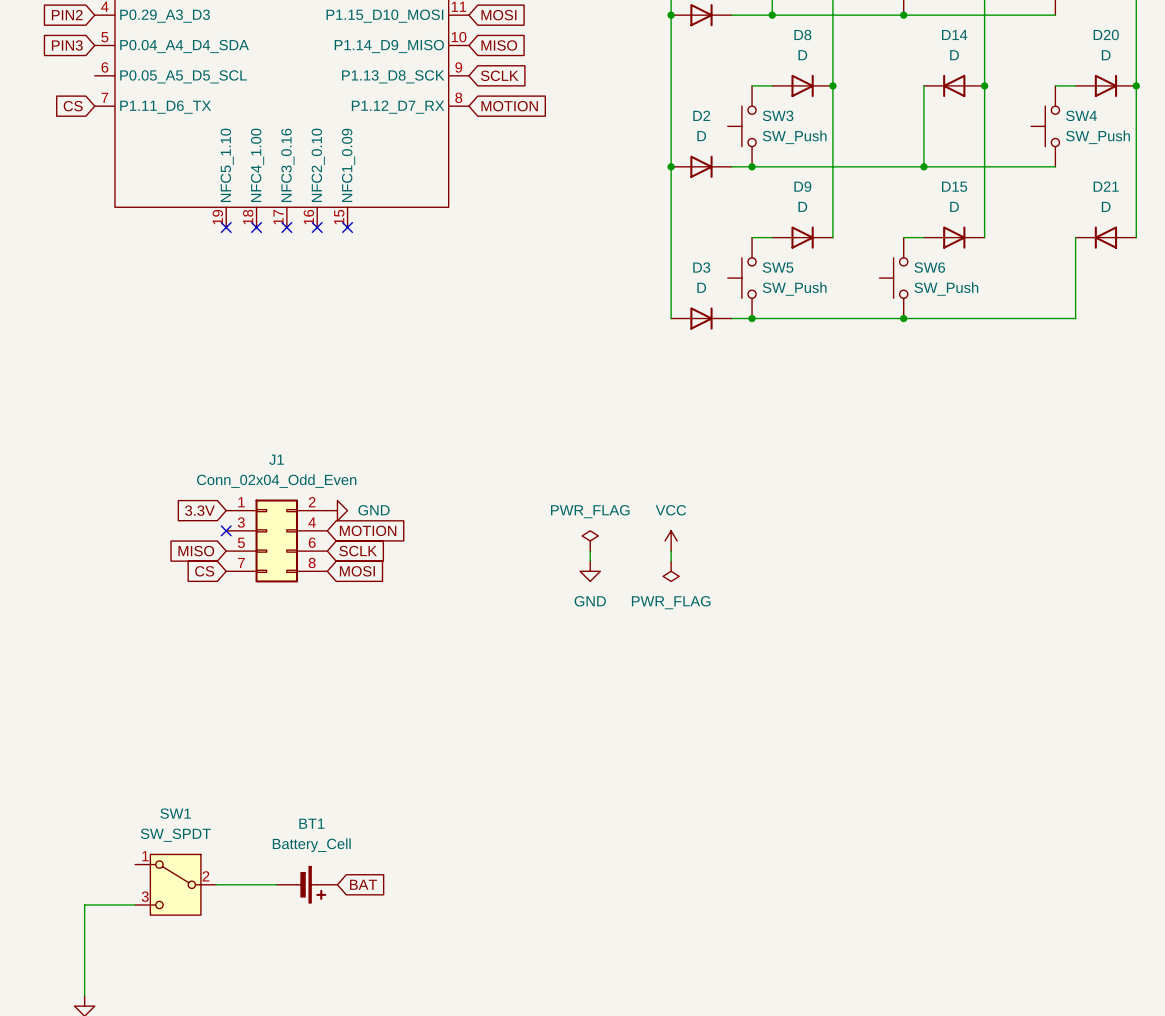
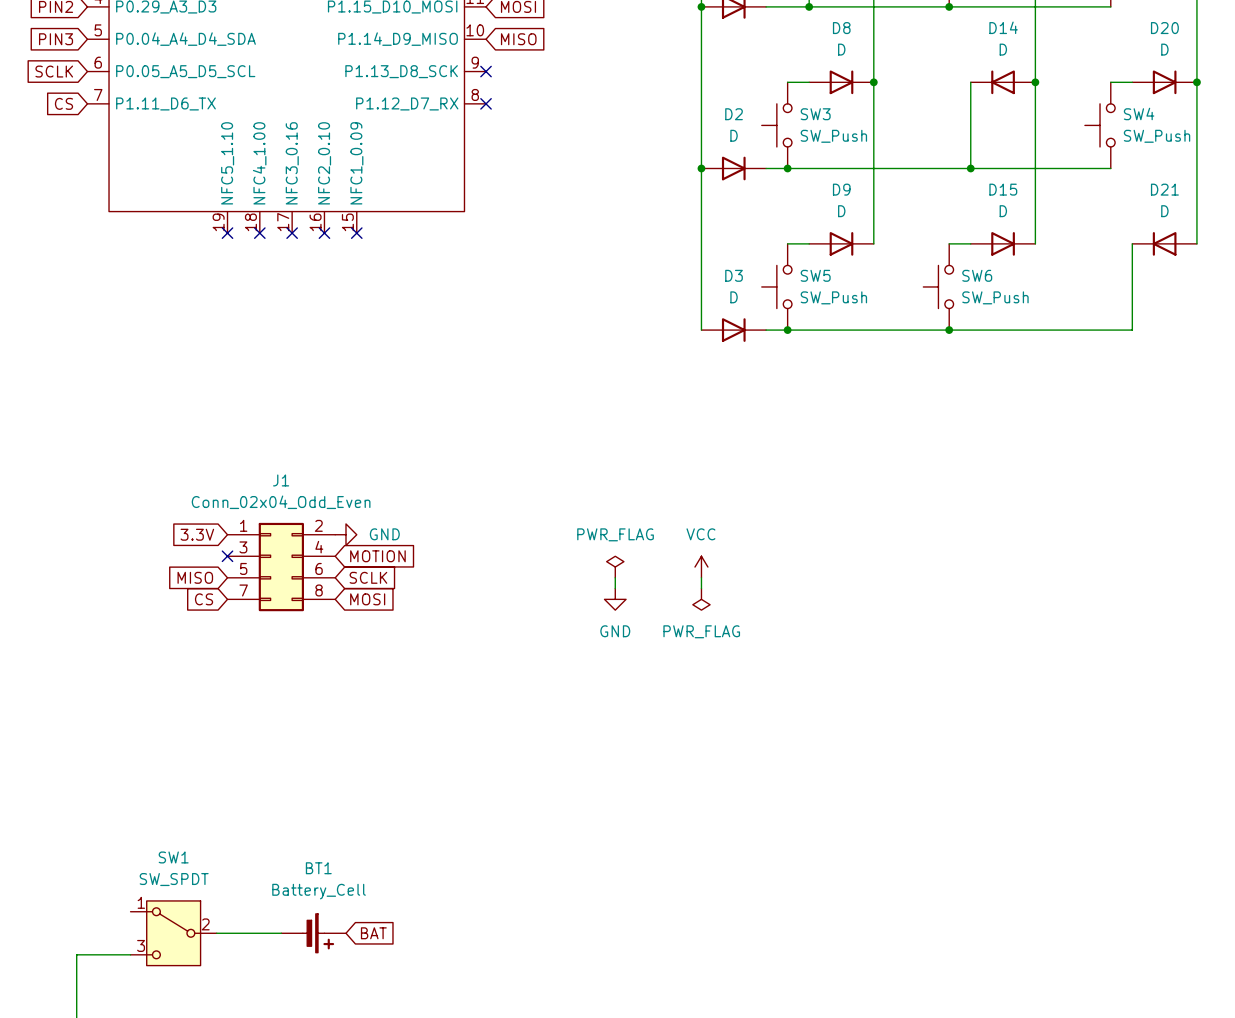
global label: none -> SCLK (54, 71)
no-connect mark: none -> (486, 71)
global label: SCLK (499, 75) -> none
no-connect mark: none -> (486, 103)
global label: MOTION (509, 106) -> none

